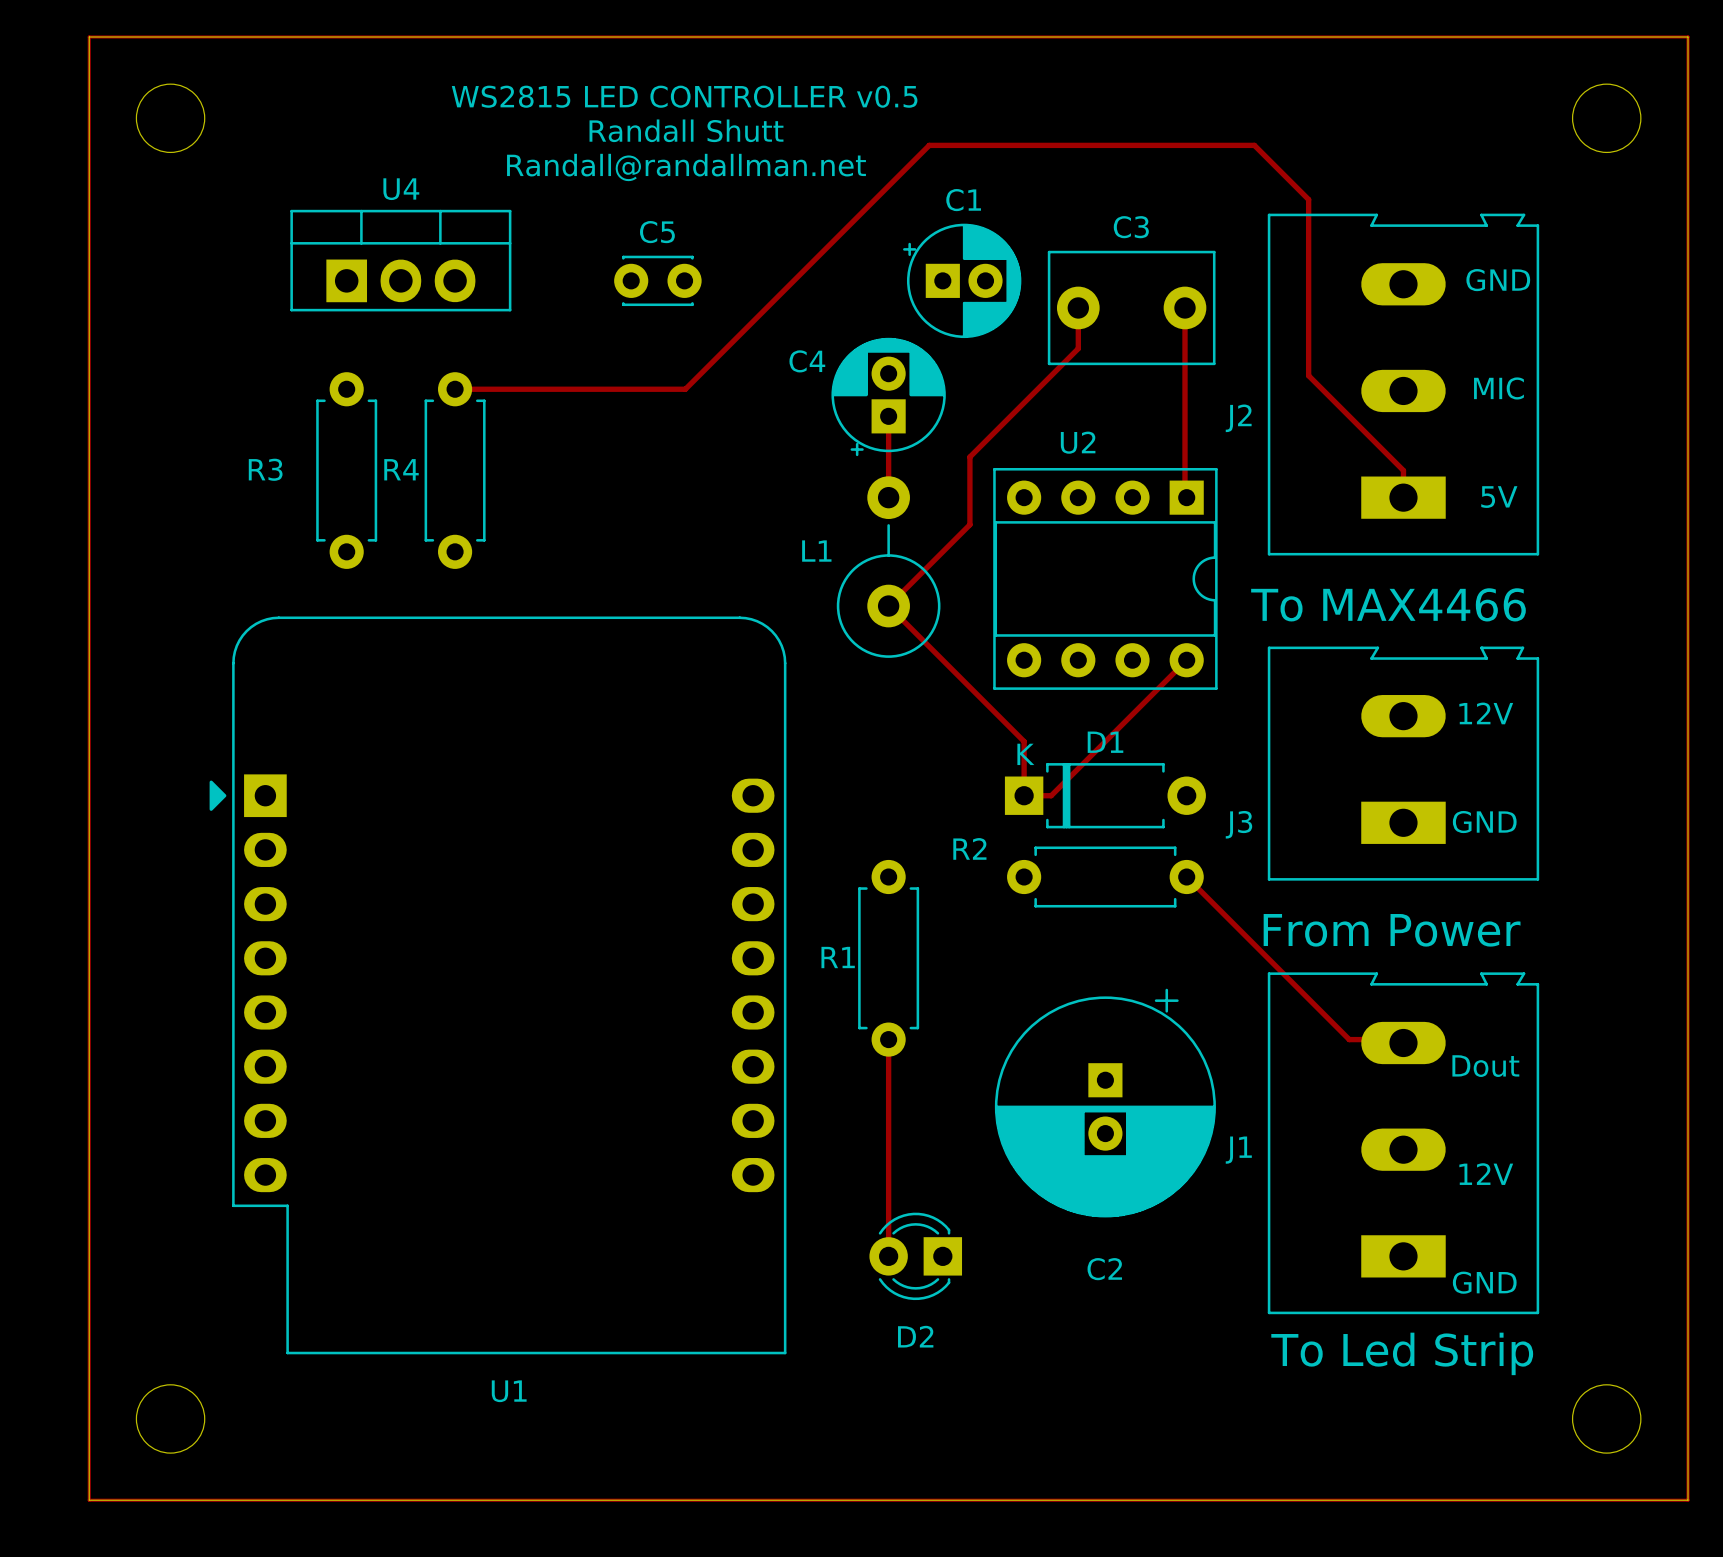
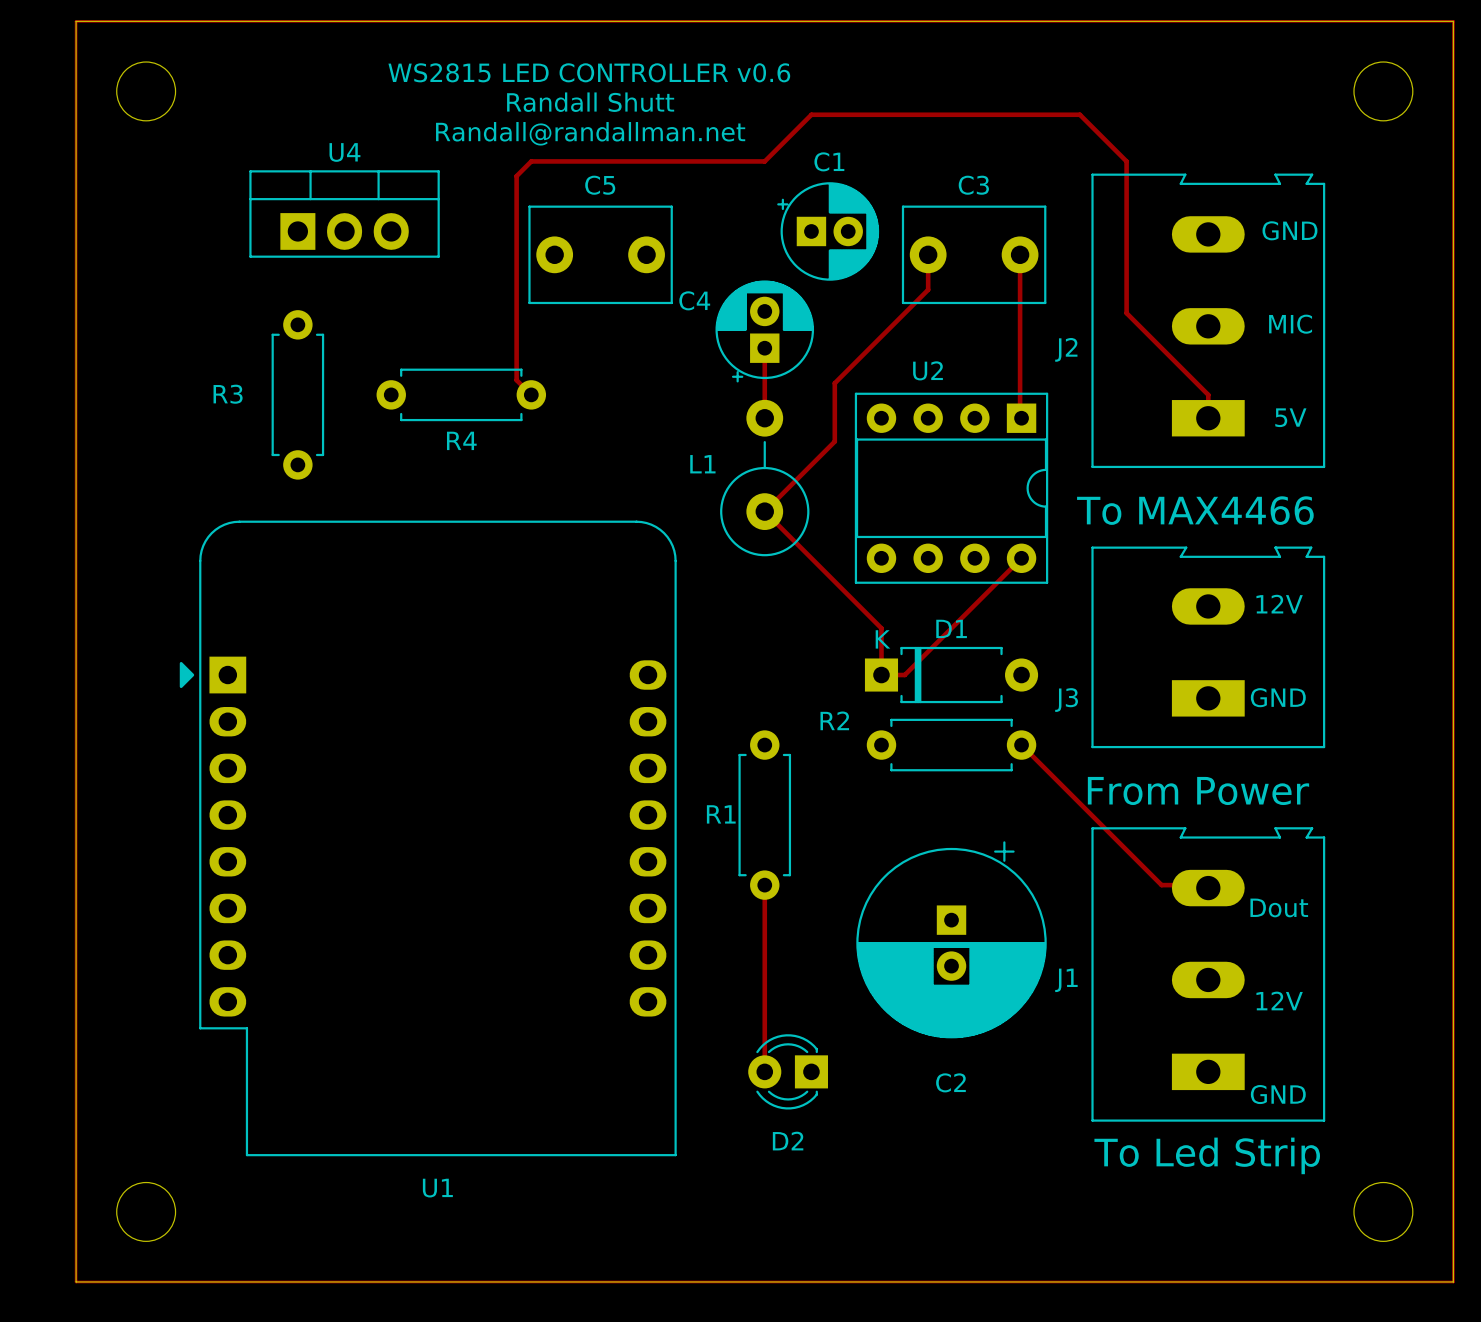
text: WS2815 LED CONTROLLER v0.5 (684, 96) -> WS2815 LED CONTROLLER v0.6 (589, 72)
track: (942, 145) (929, 145) (685, 389) (455, 389) -> (811, 114) (764, 161) (531, 161) (516, 176) (516, 380) (531, 394)
C5 footprint: [614, 255, 702, 307] -> [528, 205, 673, 305]
R4 name position: R4 (401, 469) -> R4 (461, 440)
R4 rotation: 0° (455, 470) -> 90° clockwise (461, 394)

